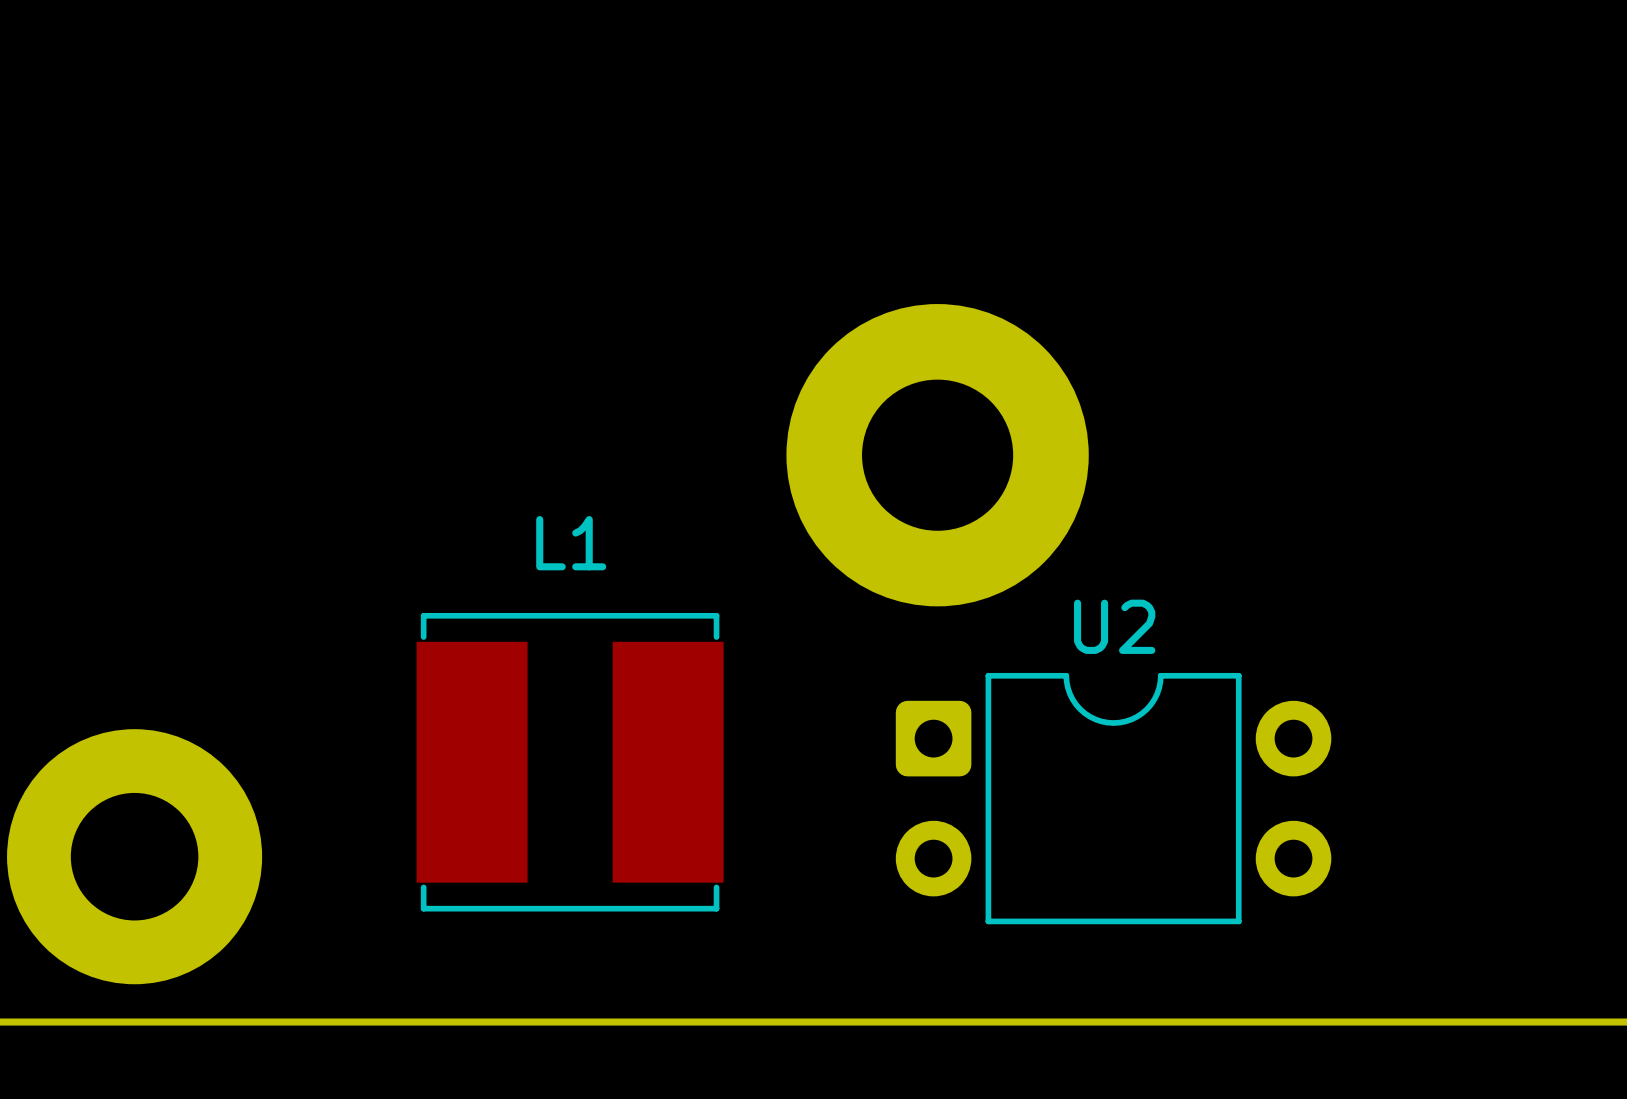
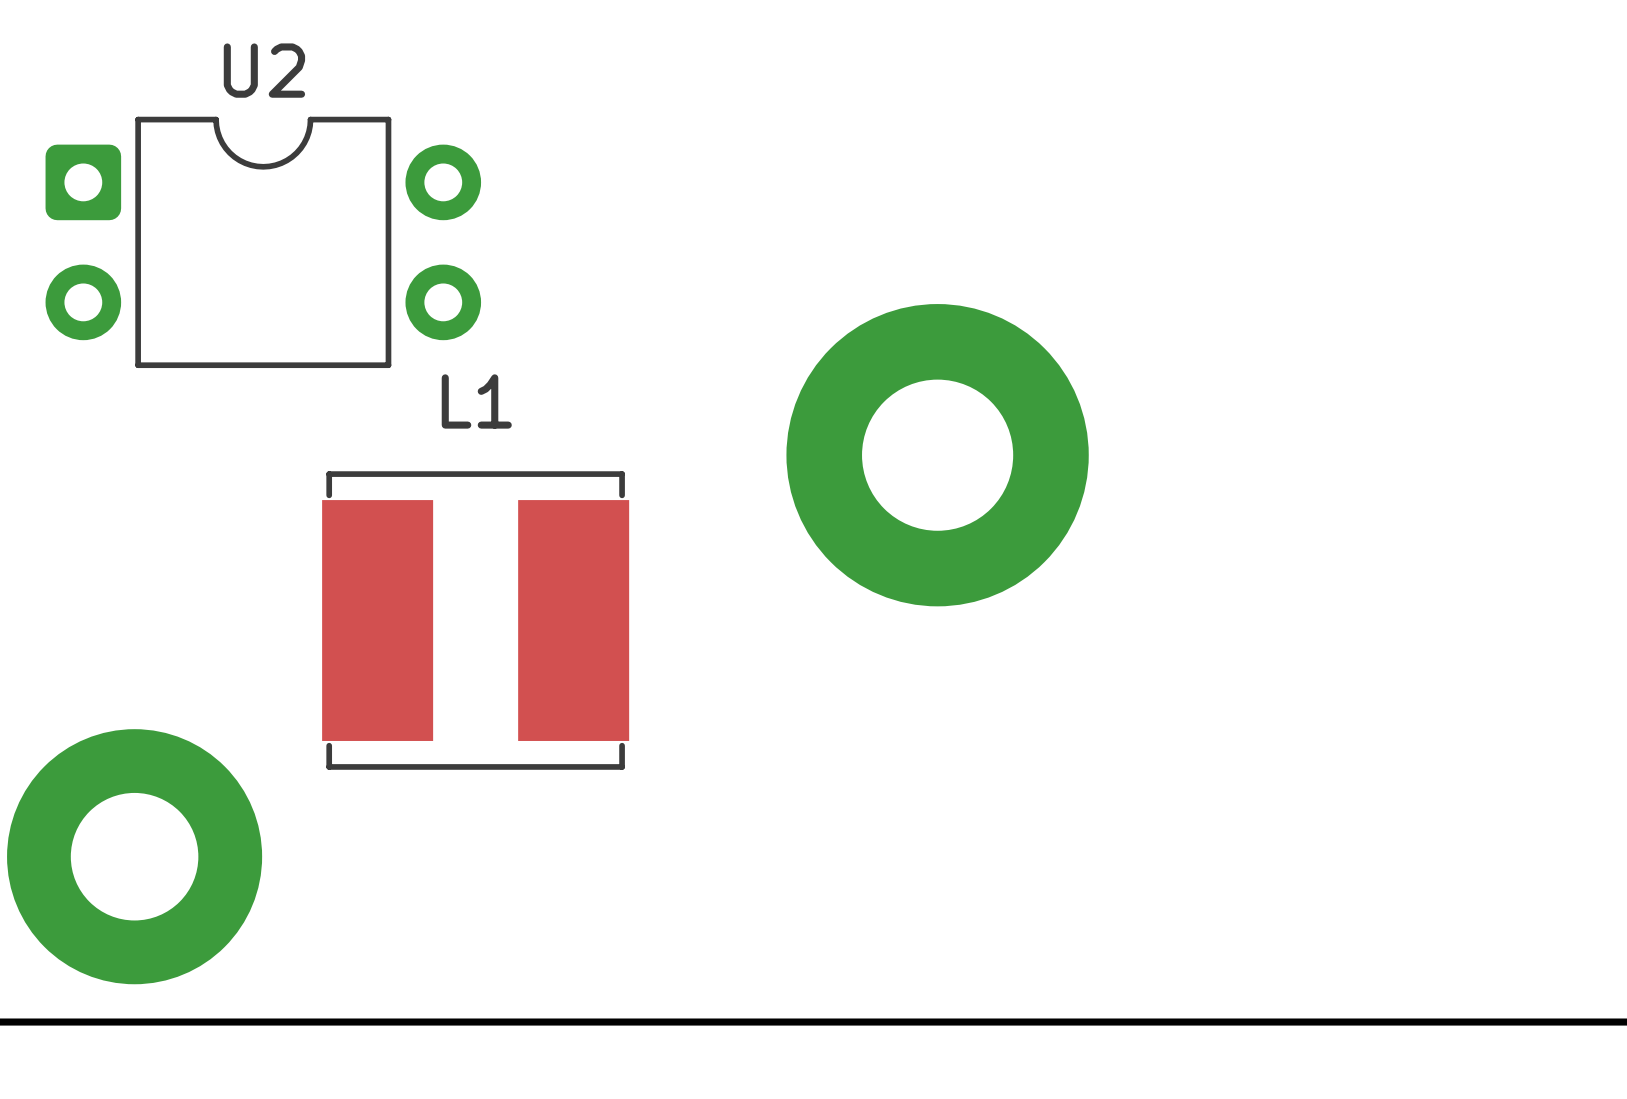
L1 position: (570, 762) -> (475, 620)
U2 position: (1113, 798) -> (263, 242)

